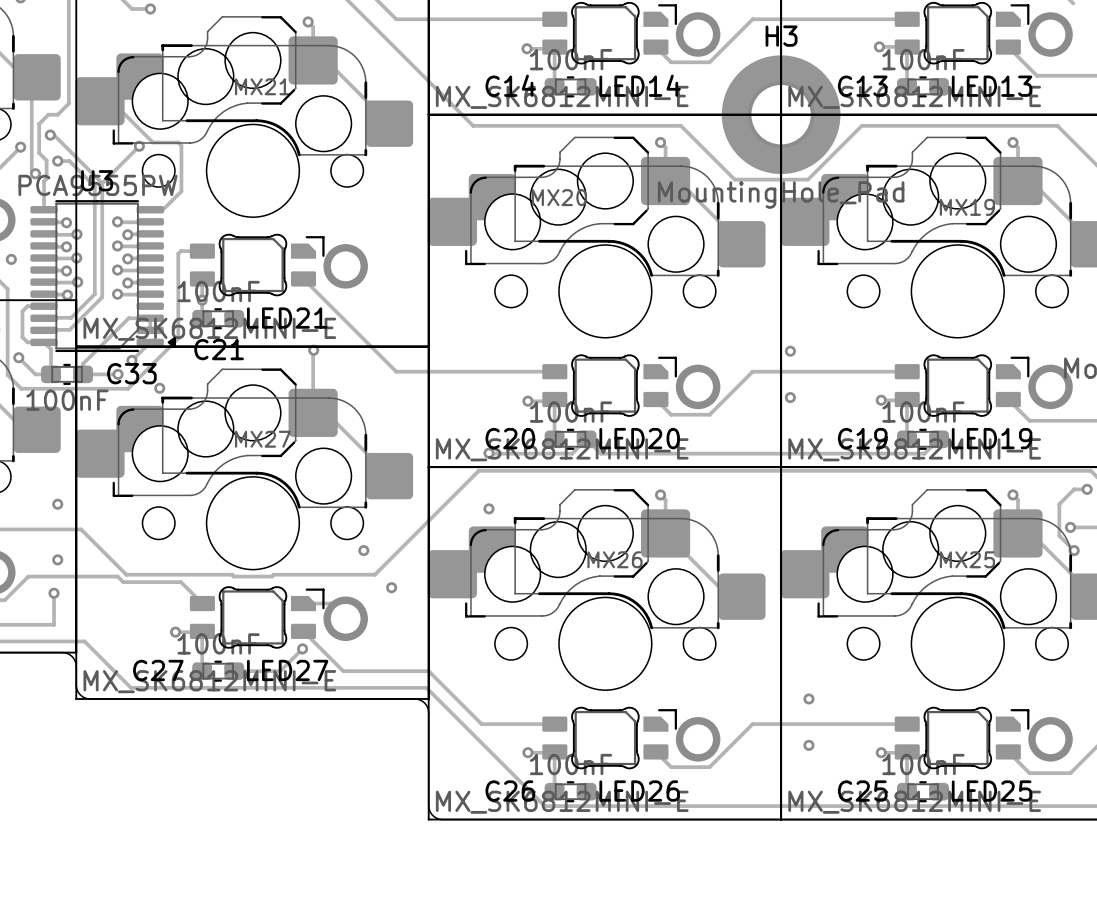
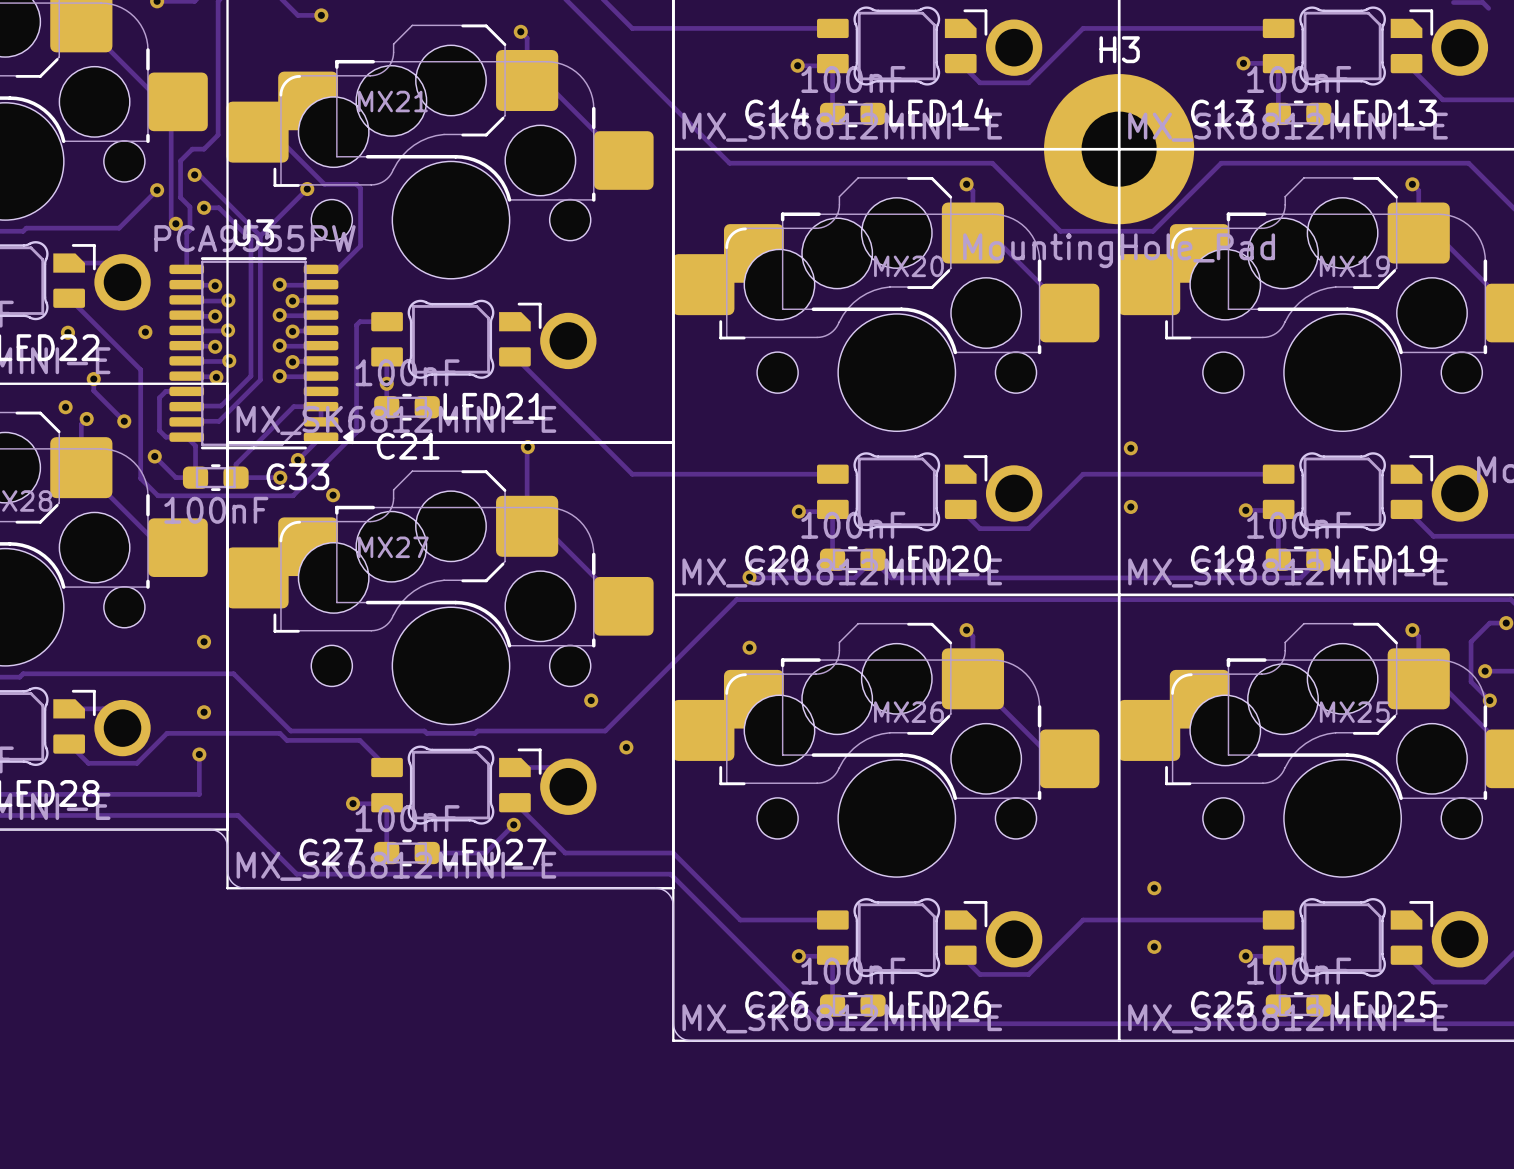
MX21 name position: MX21 (262, 86) -> MX21 (392, 101)
MX20 name position: MX20 (559, 197) -> MX20 (908, 266)
MX27 name position: MX27 (262, 439) -> MX27 (393, 547)

